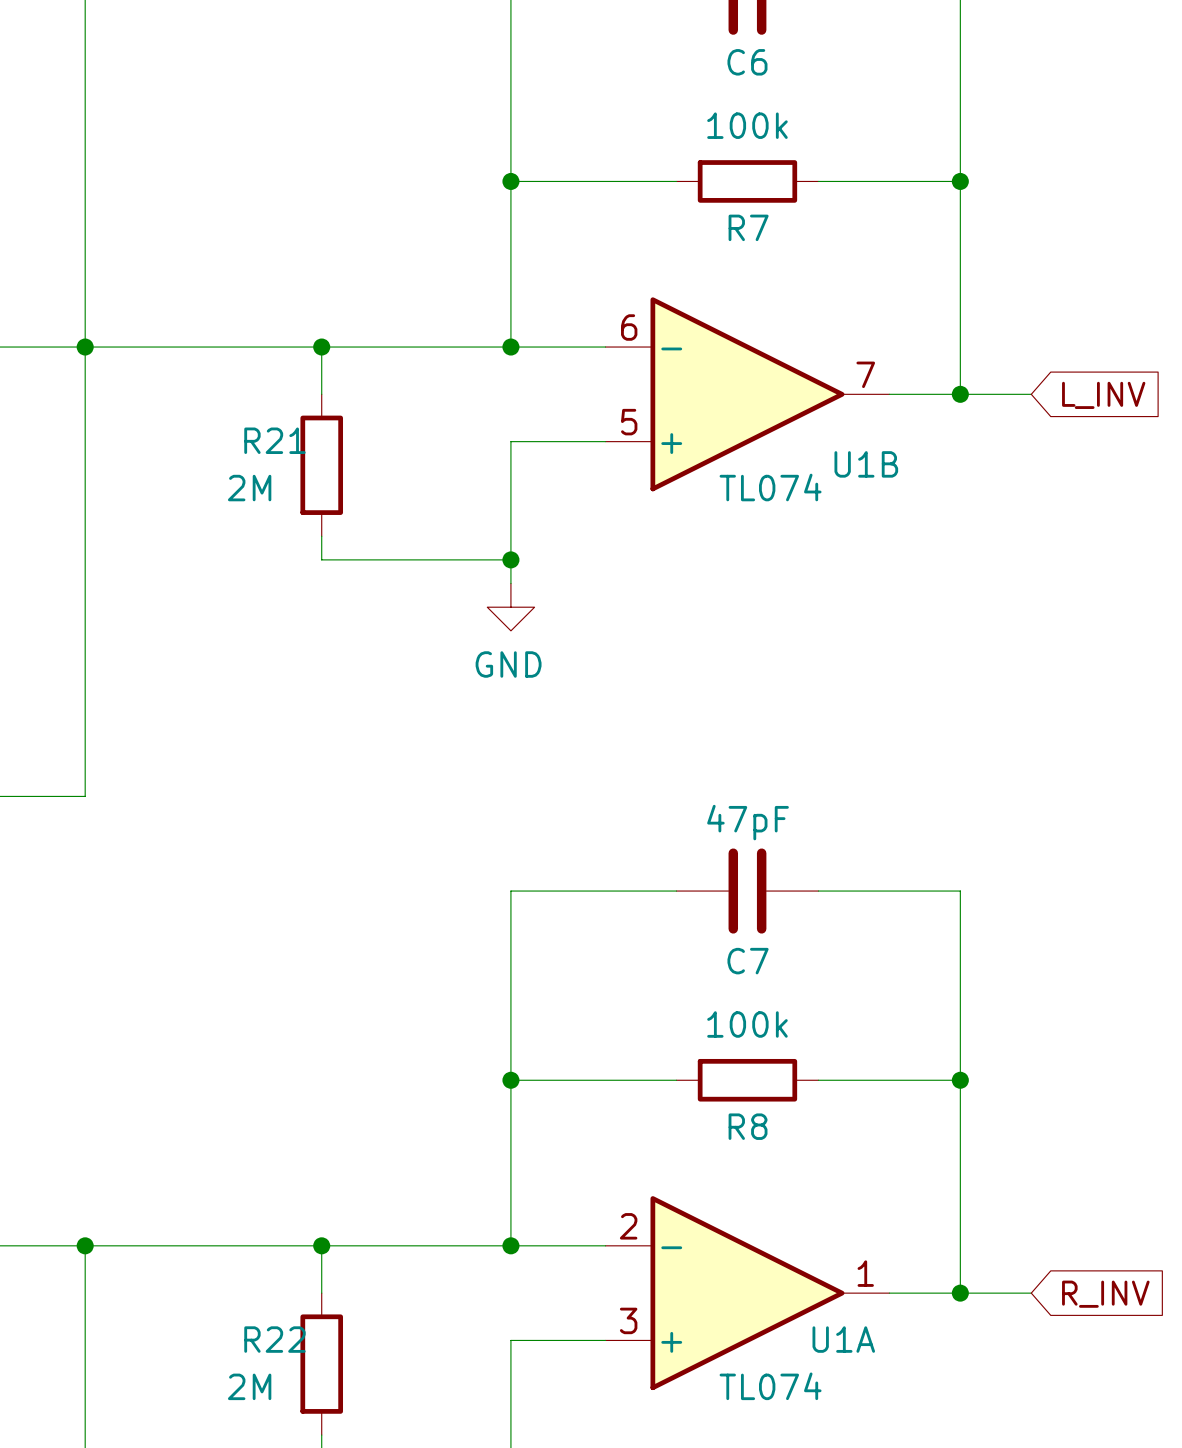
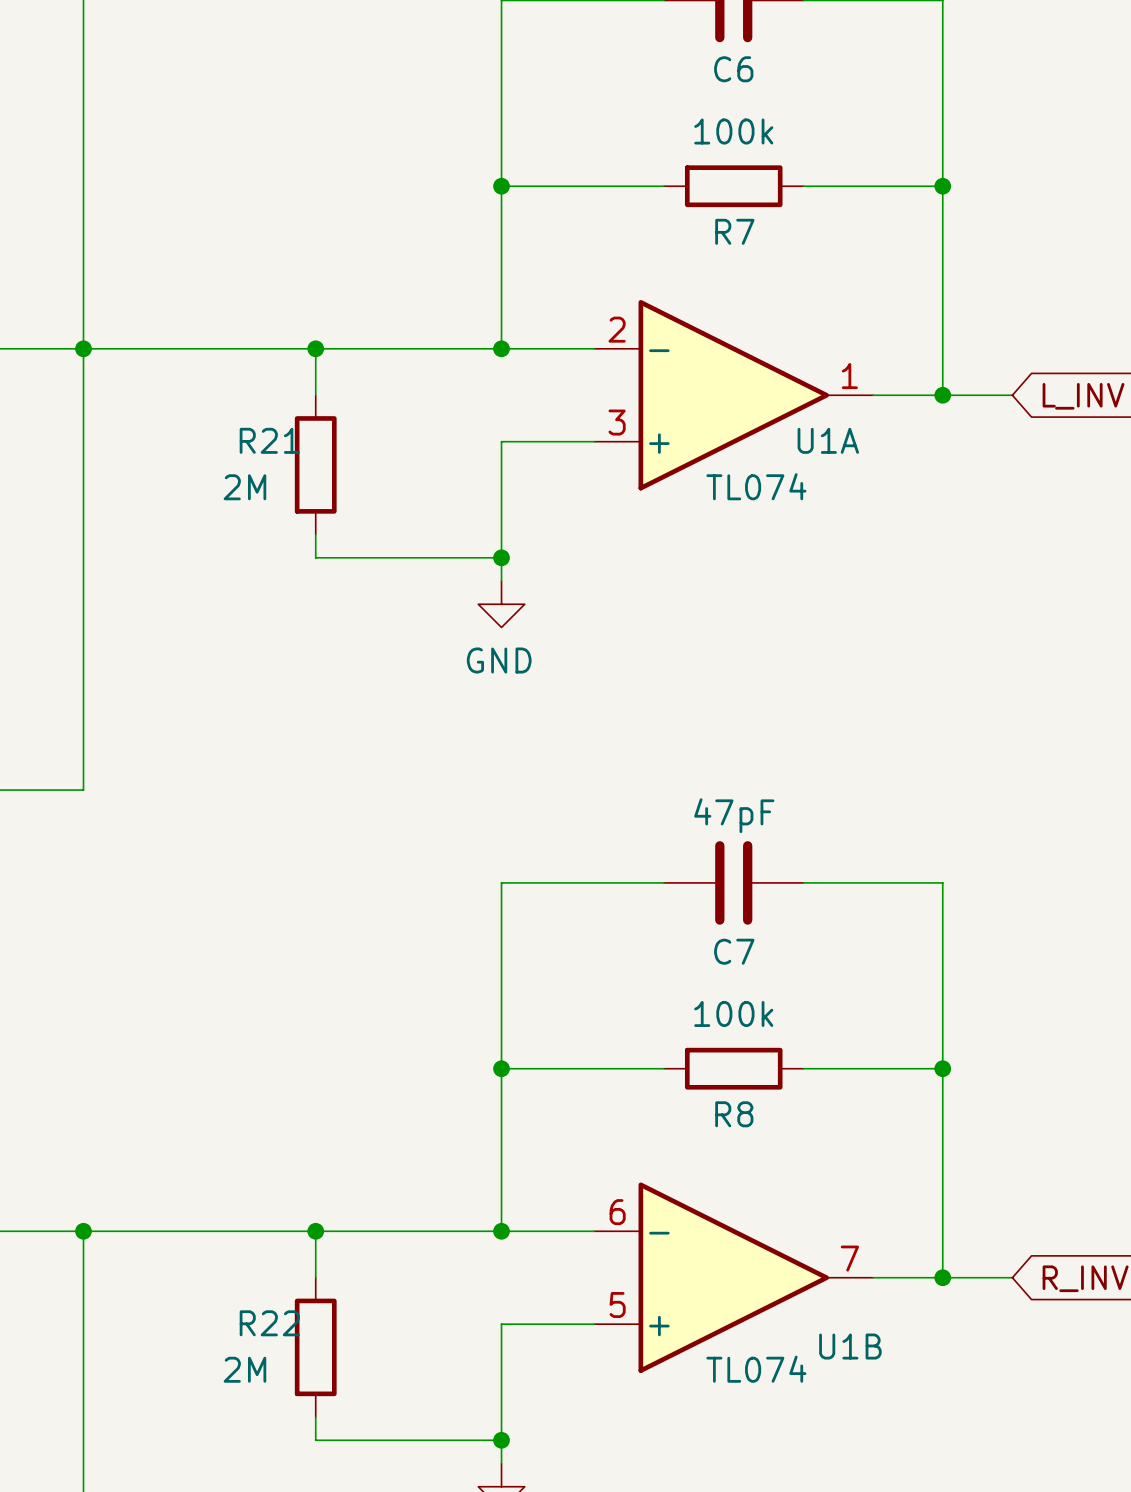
U1B position: (747, 394) -> (733, 1277)
U1A position: (747, 1293) -> (733, 395)

